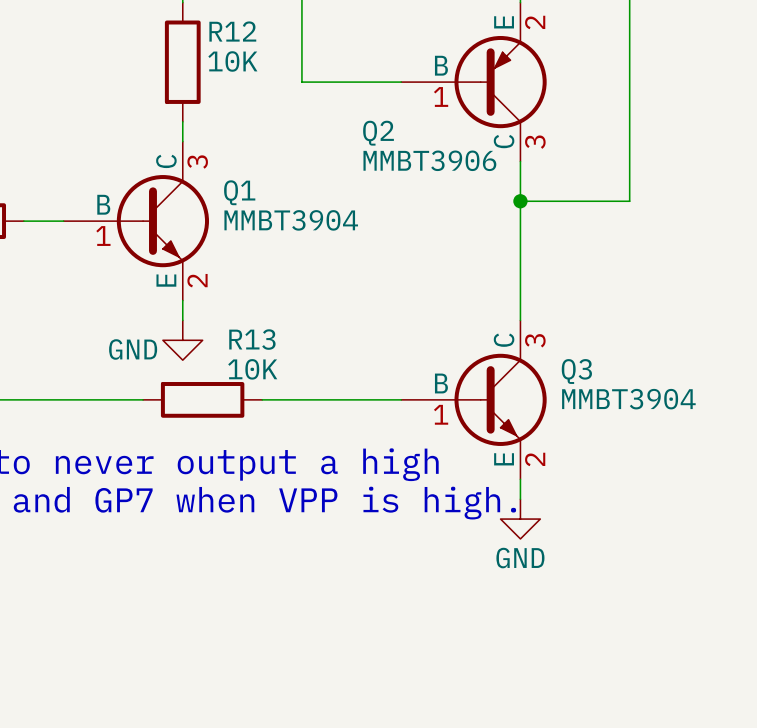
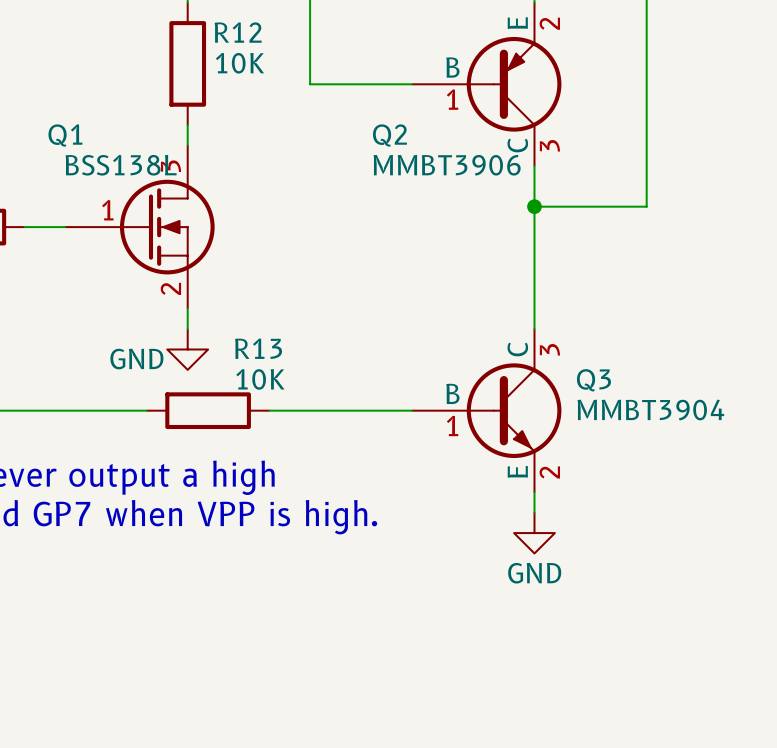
Q1 symbol: [63, 141, 209, 301] -> [65, 145, 215, 309]
Q1 name position: Q1 (239, 192) -> Q1 (65, 135)
Q1 value: MMBT3904 (291, 220) -> BSS138L (121, 165)

